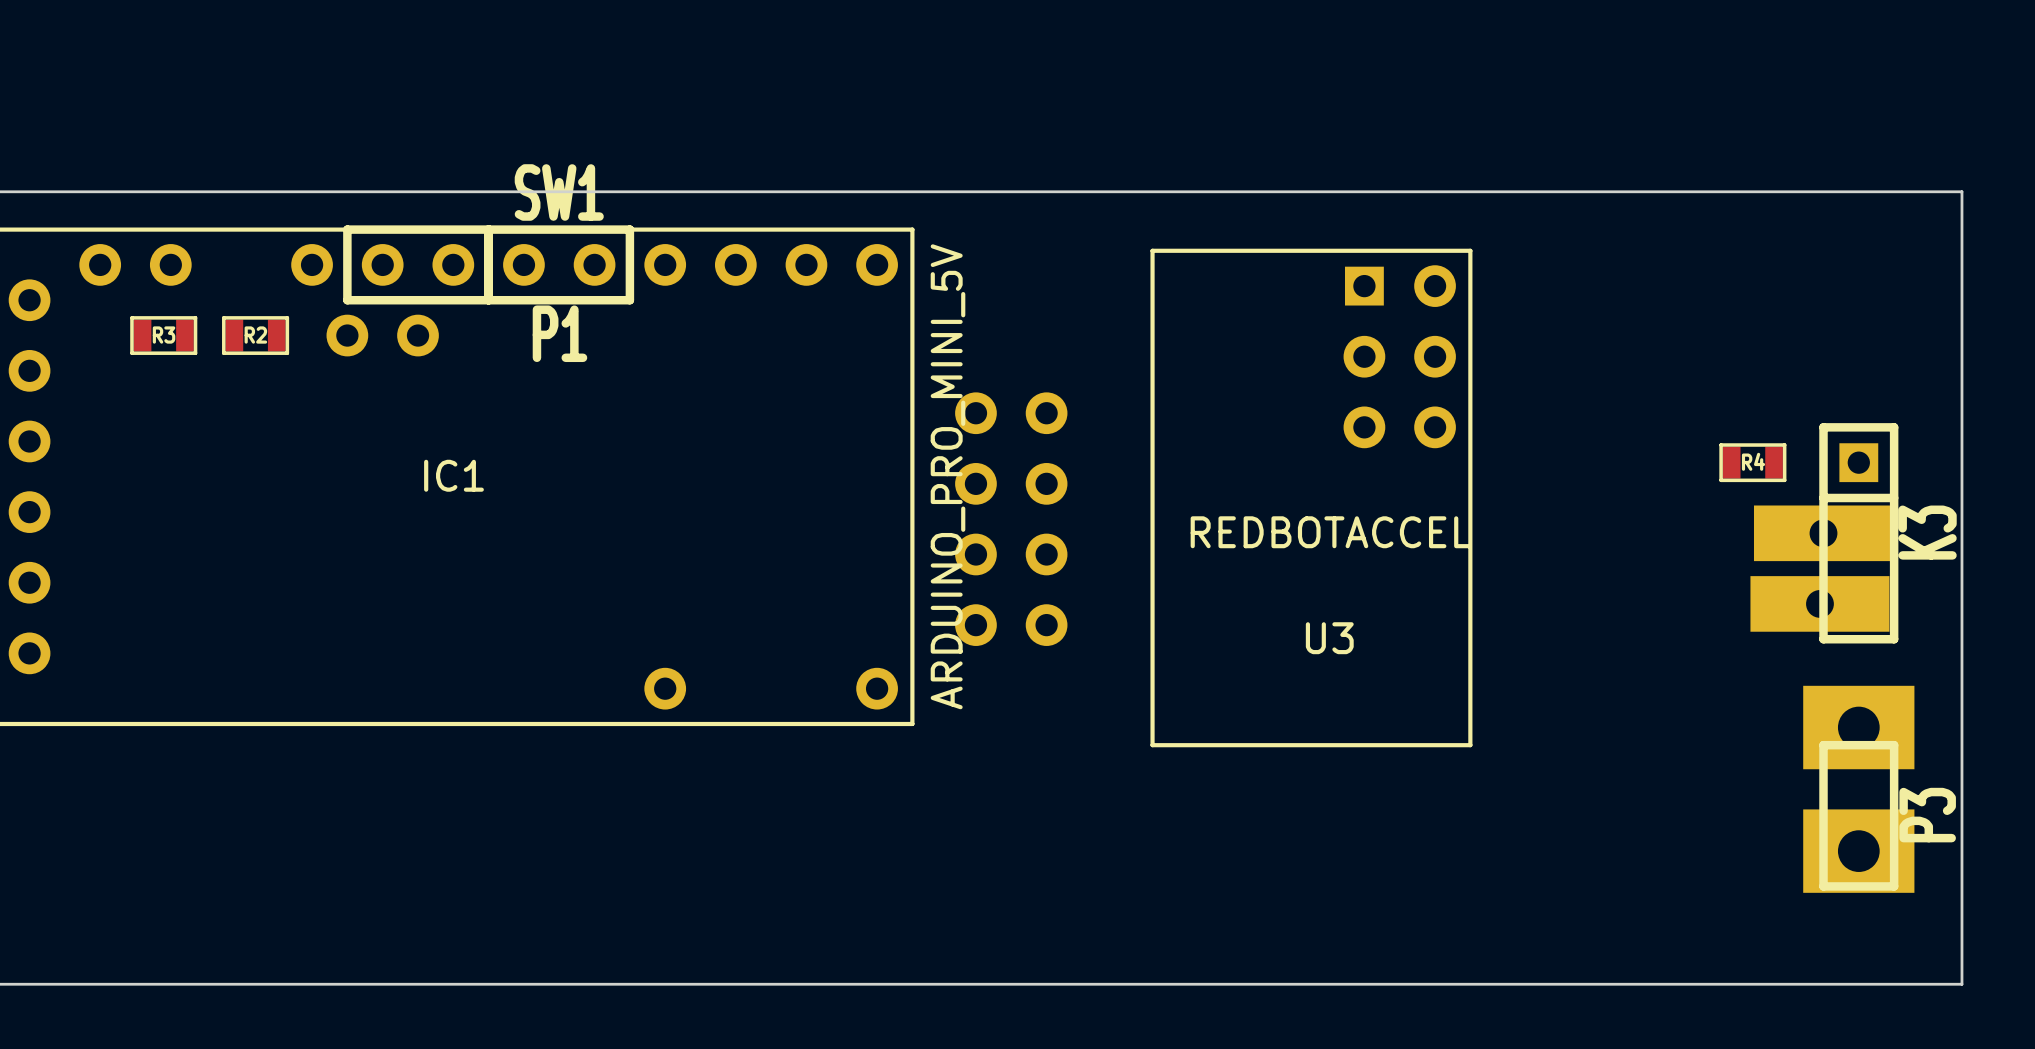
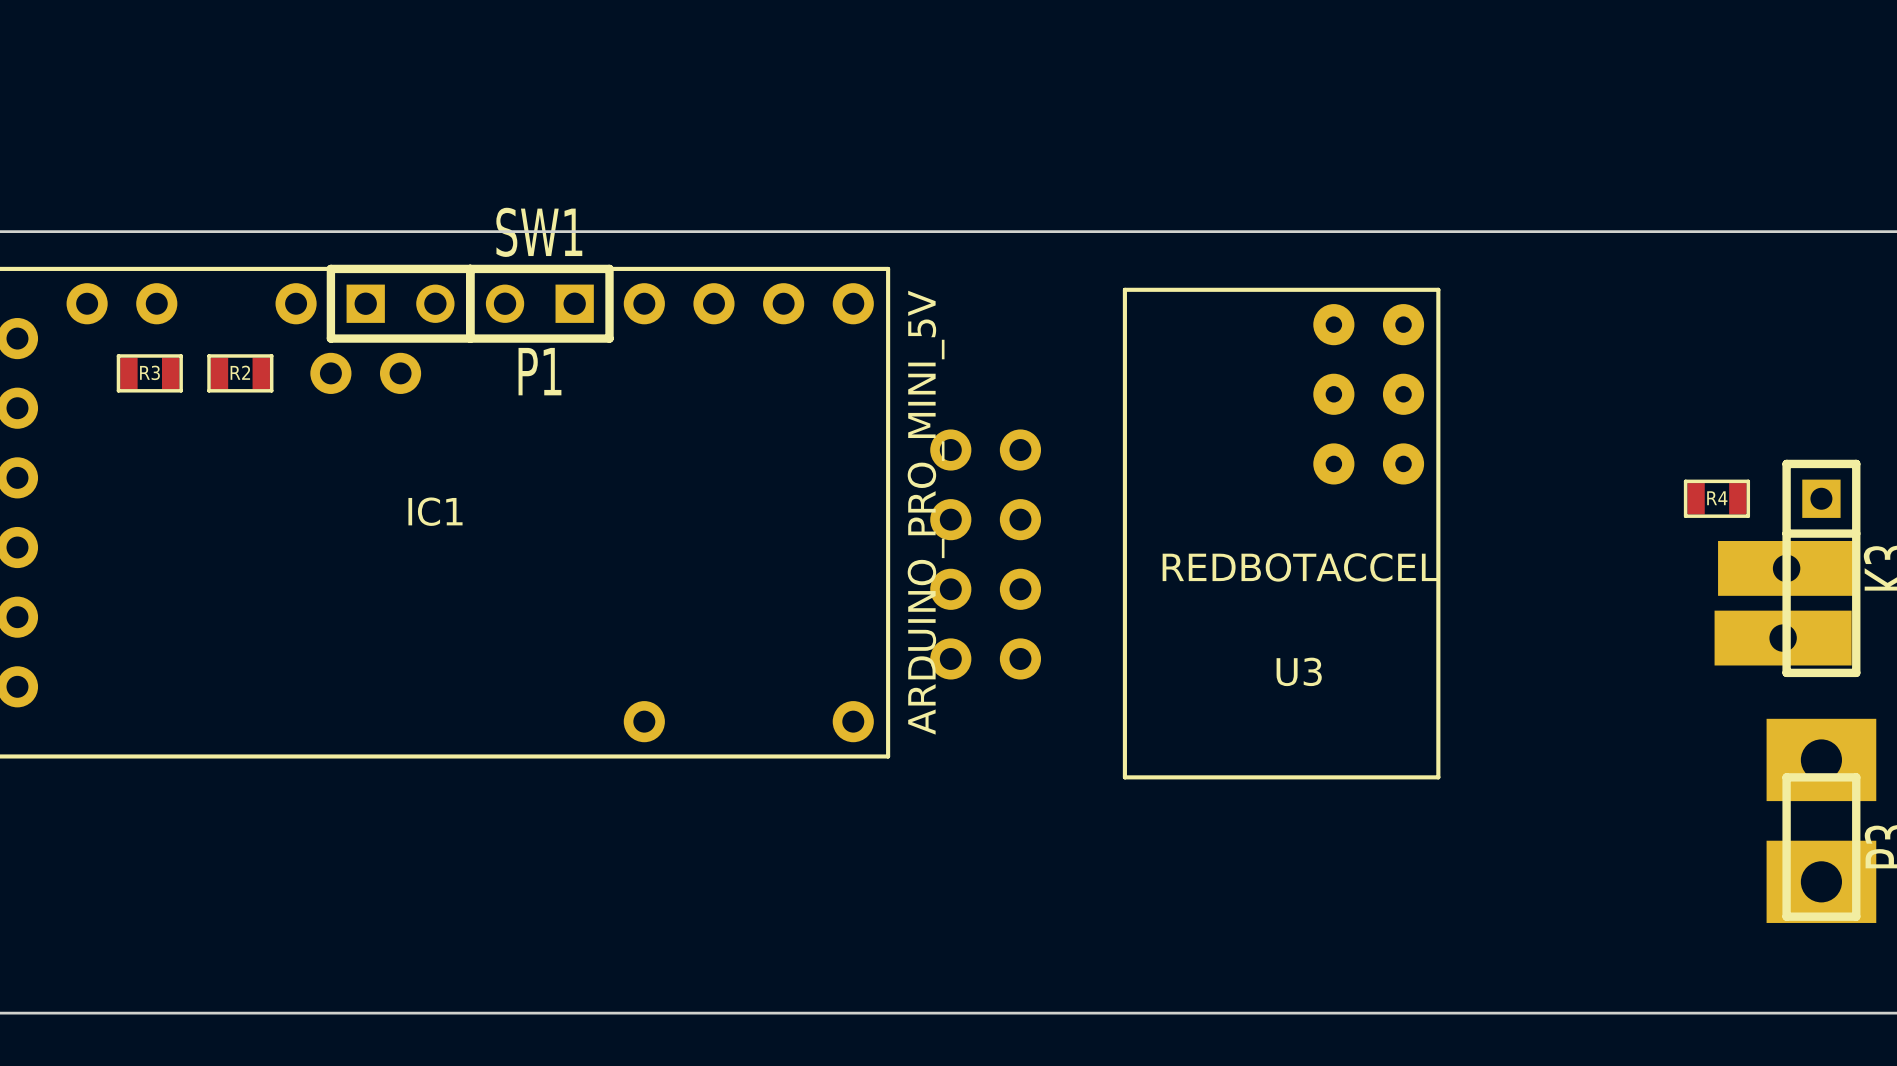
SW1 footprint: [343, 225, 493, 305] -> [326, 264, 475, 343]
P1 footprint: [484, 225, 635, 305] -> [466, 264, 614, 343]
U3 footprint: [1150, 248, 1473, 748] -> [1122, 287, 1441, 780]

